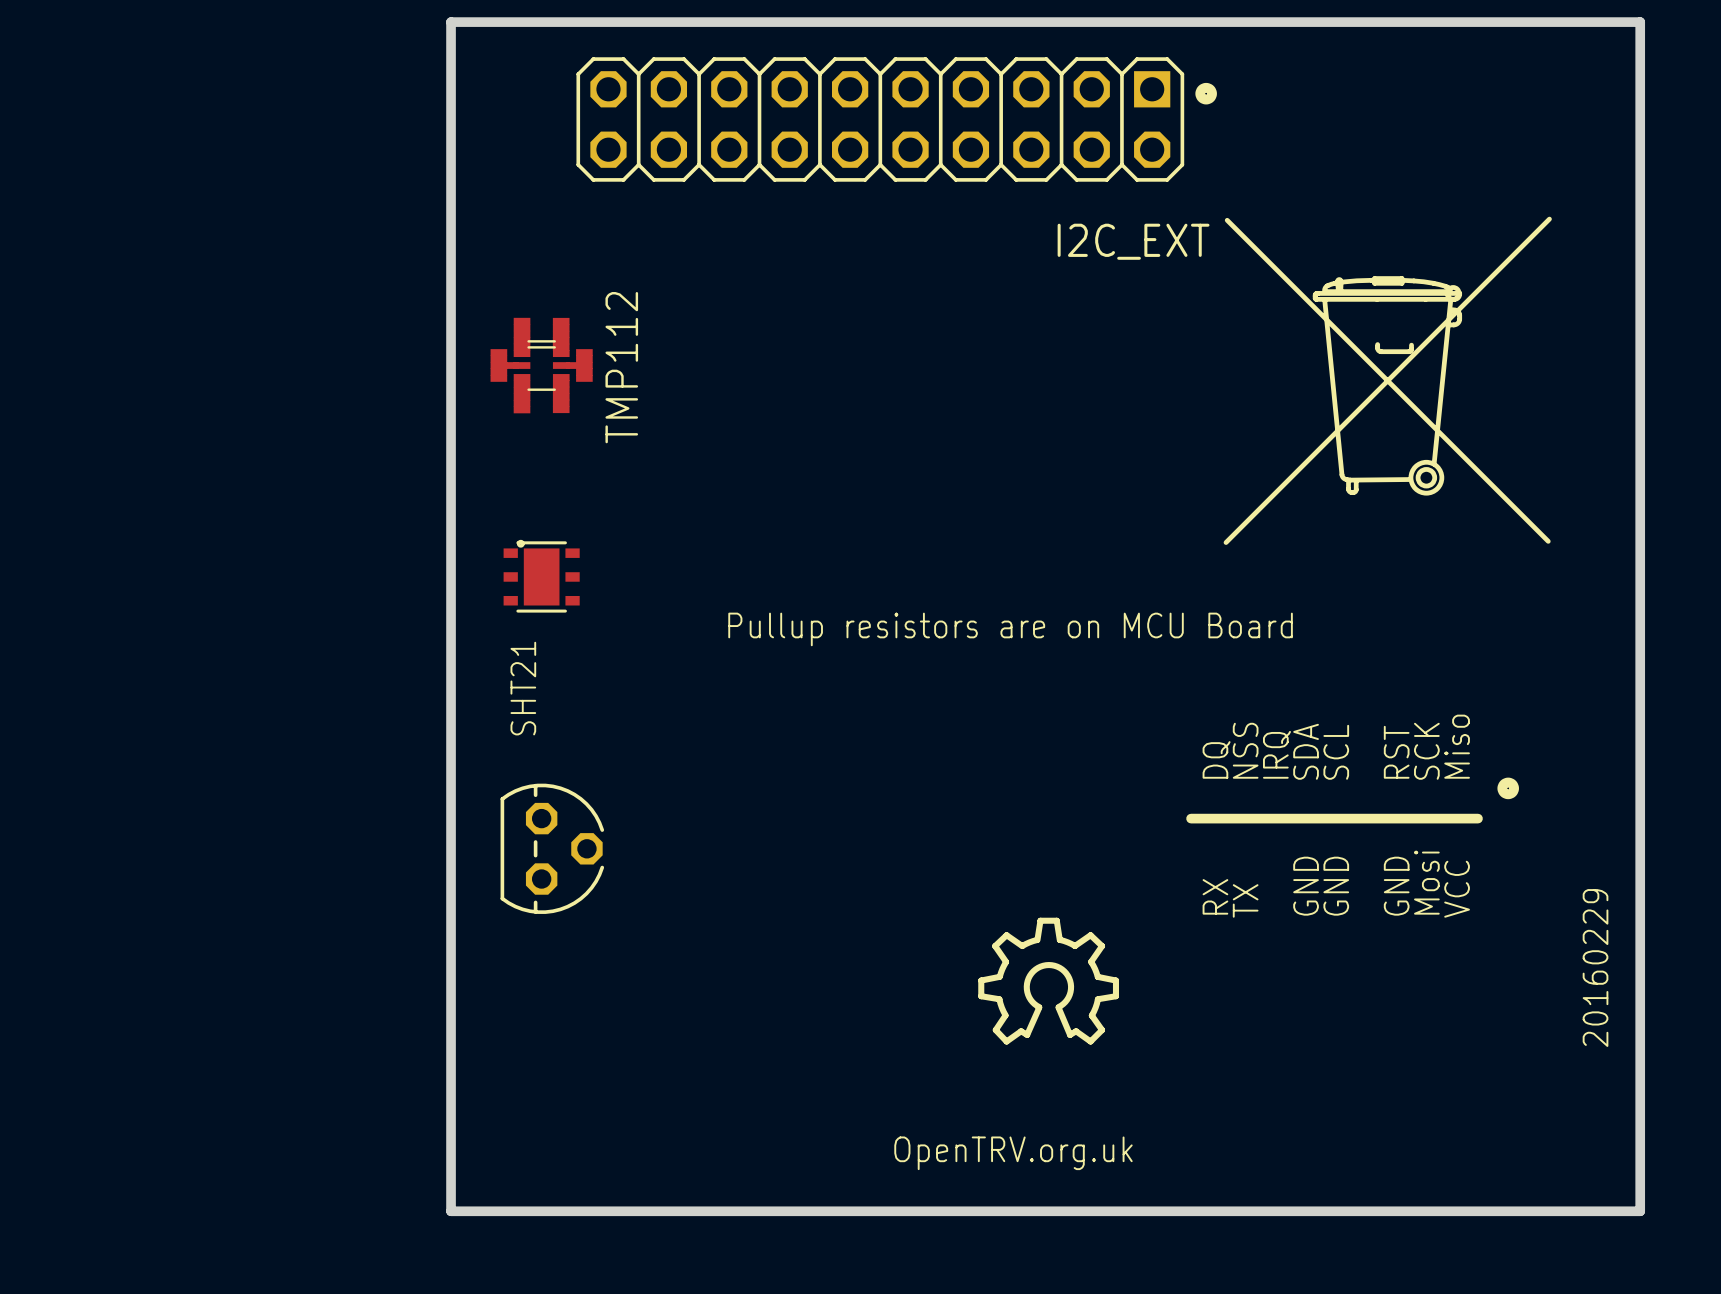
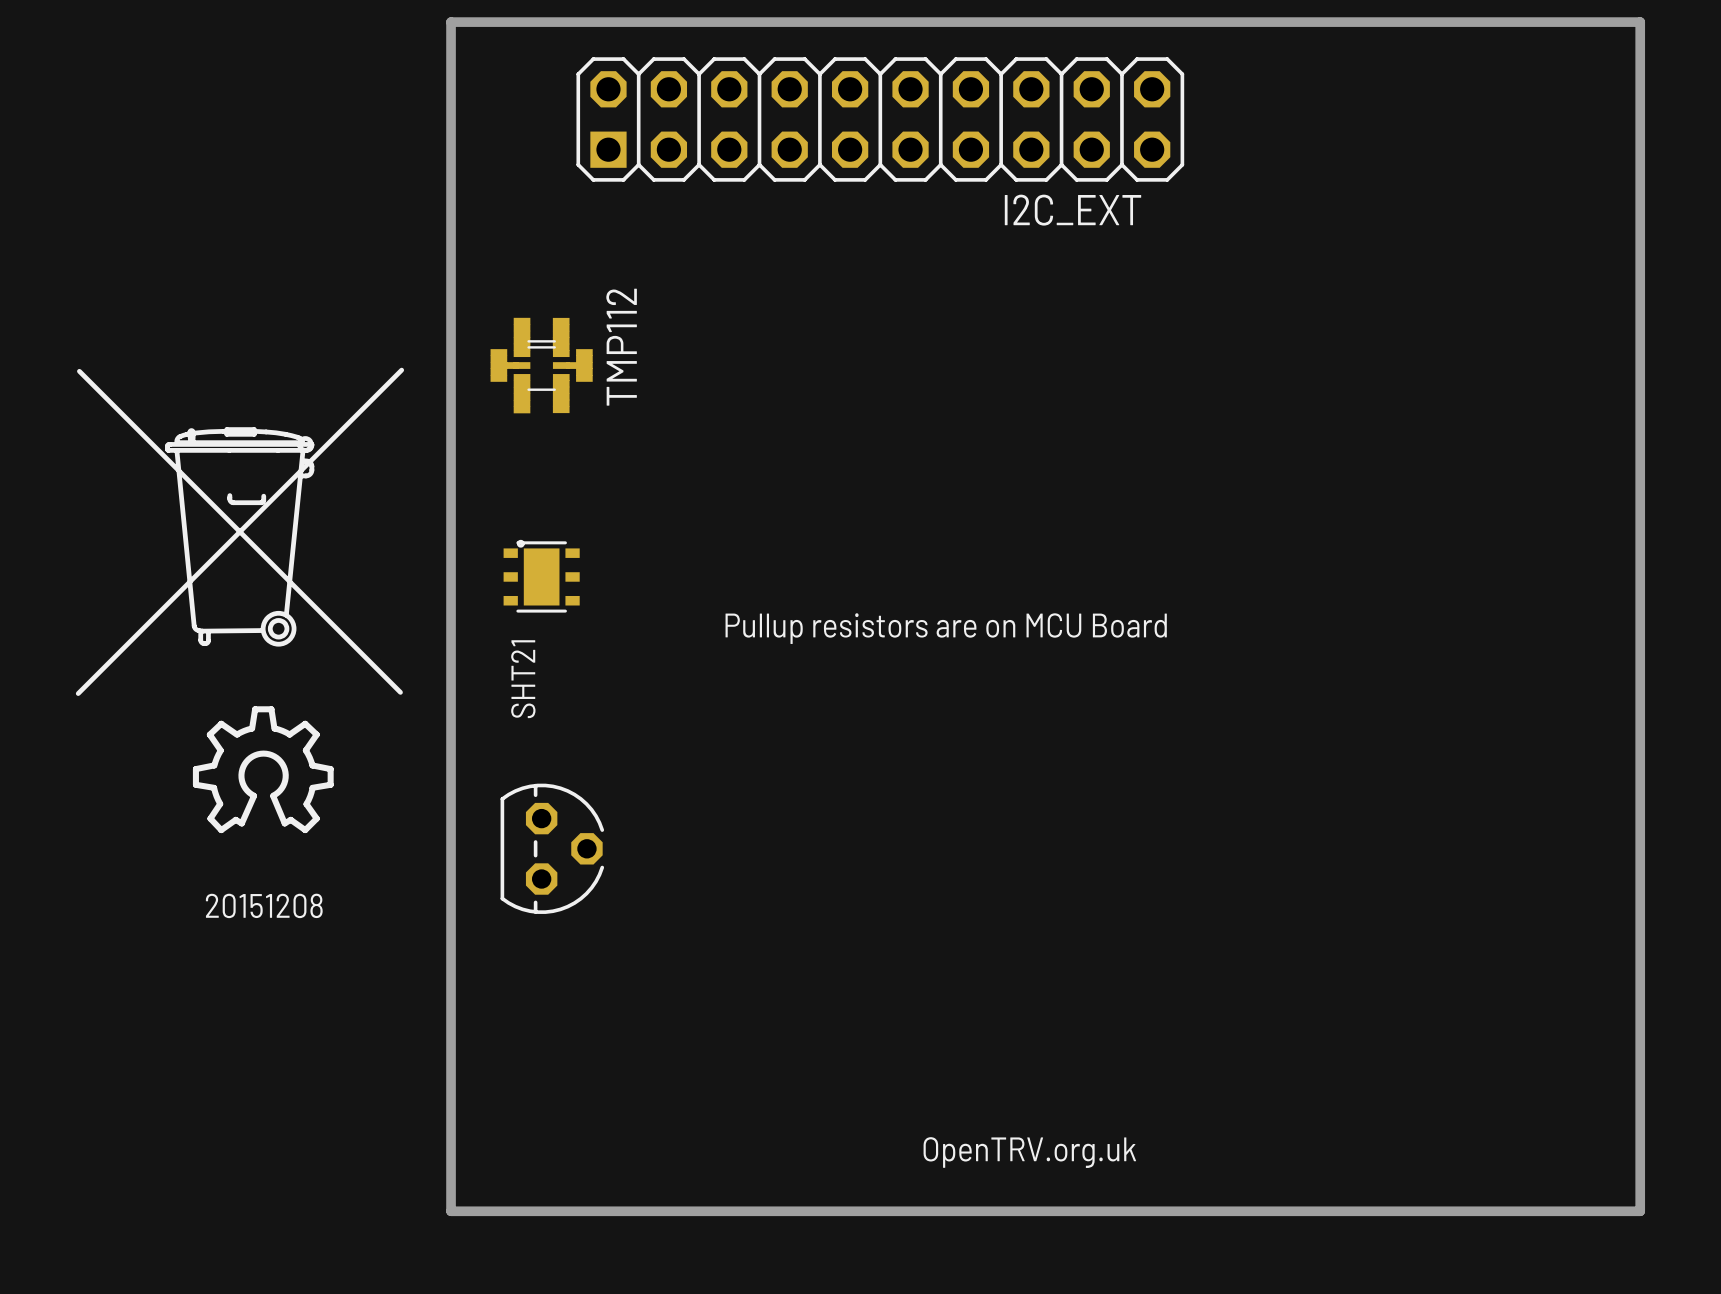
drawing: [1195, 82, 1217, 105] -> none
I2C_EXT rotation: 0° (880, 119) -> 180° (880, 119)
drawing: [1223, 216, 1552, 545] -> none
drawing: none -> [75, 367, 405, 834]
text: Miso (1457, 746) -> none
text: NSS (1245, 750) -> none
text: SDA (1306, 751) -> none
text: SCK (1426, 751) -> none
text: SCL (1336, 752) -> none
text: RST (1396, 752) -> none
text: IRQ (1276, 754) -> none
text: DQ (1216, 759) -> none
drawing: [1497, 777, 1519, 800] -> none
line: (1191, 818) (1478, 818) -> none
text: Mosi (1426, 882) -> none
text: GND (1306, 886) -> none
text: GND (1336, 886) -> none
text: GND (1396, 886) -> none
text: VCC (1457, 889) -> none
text: RX (1215, 896) -> none
text: TX (1245, 900) -> none
text: none -> 20151208 (264, 905)
drawing: [978, 917, 1120, 1045] -> none
text: 20160229 (1595, 968) -> none

